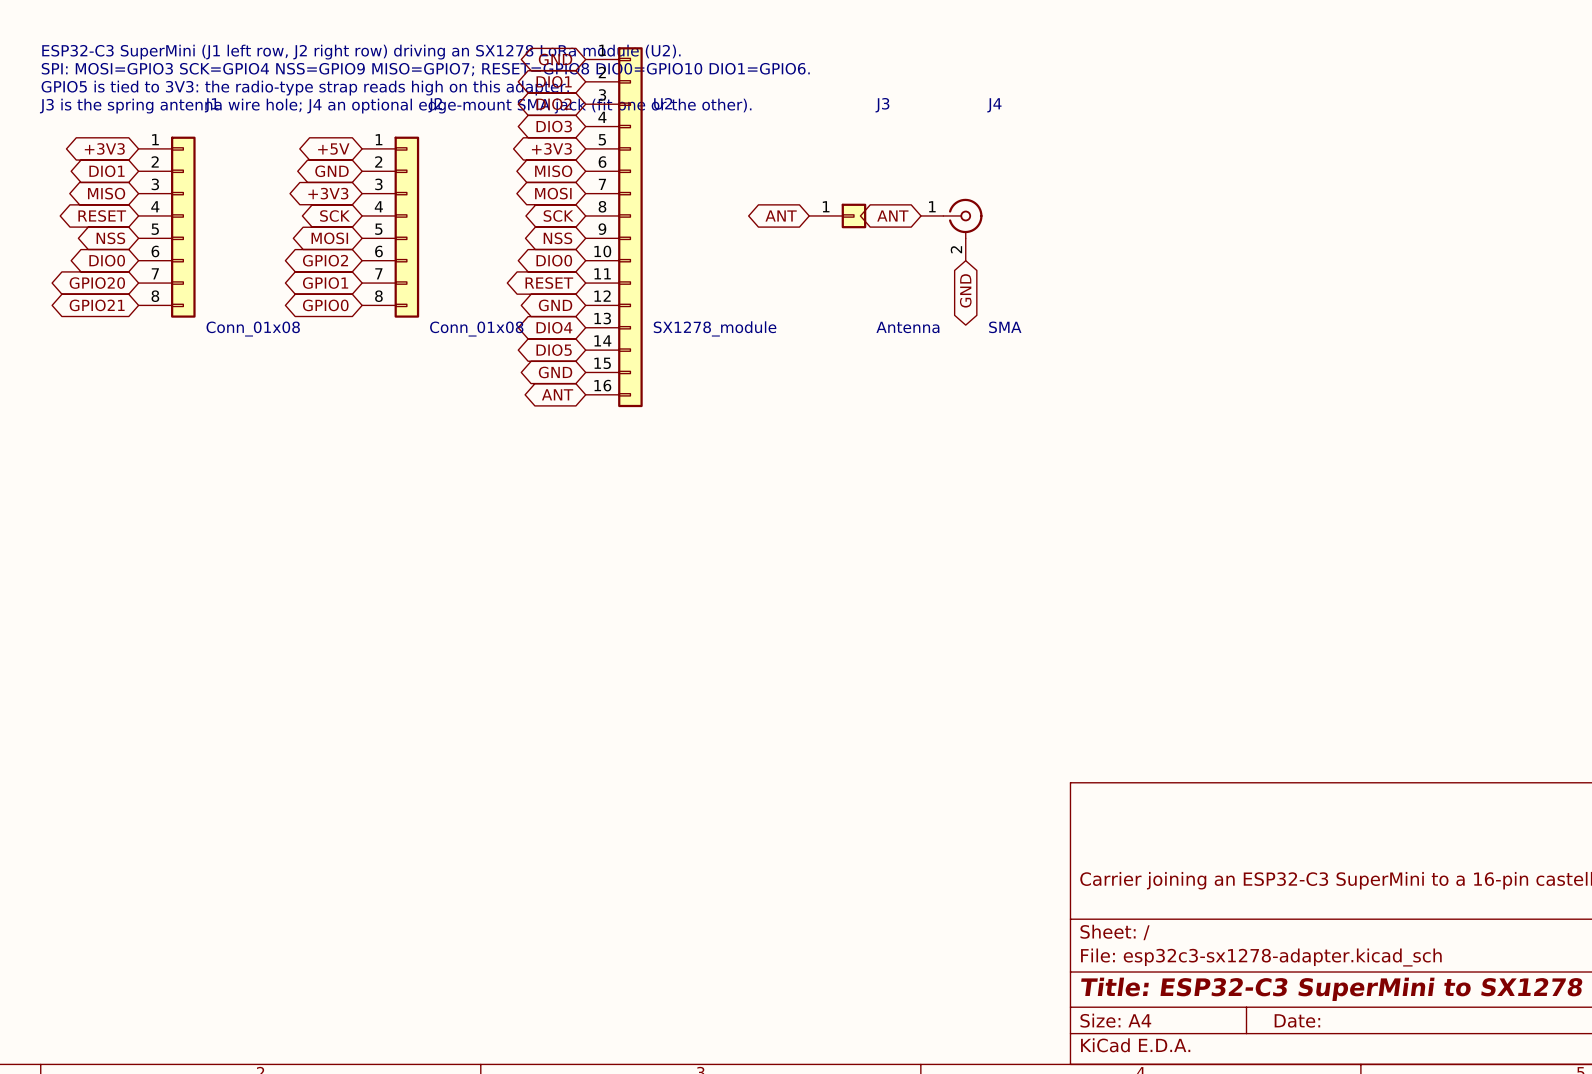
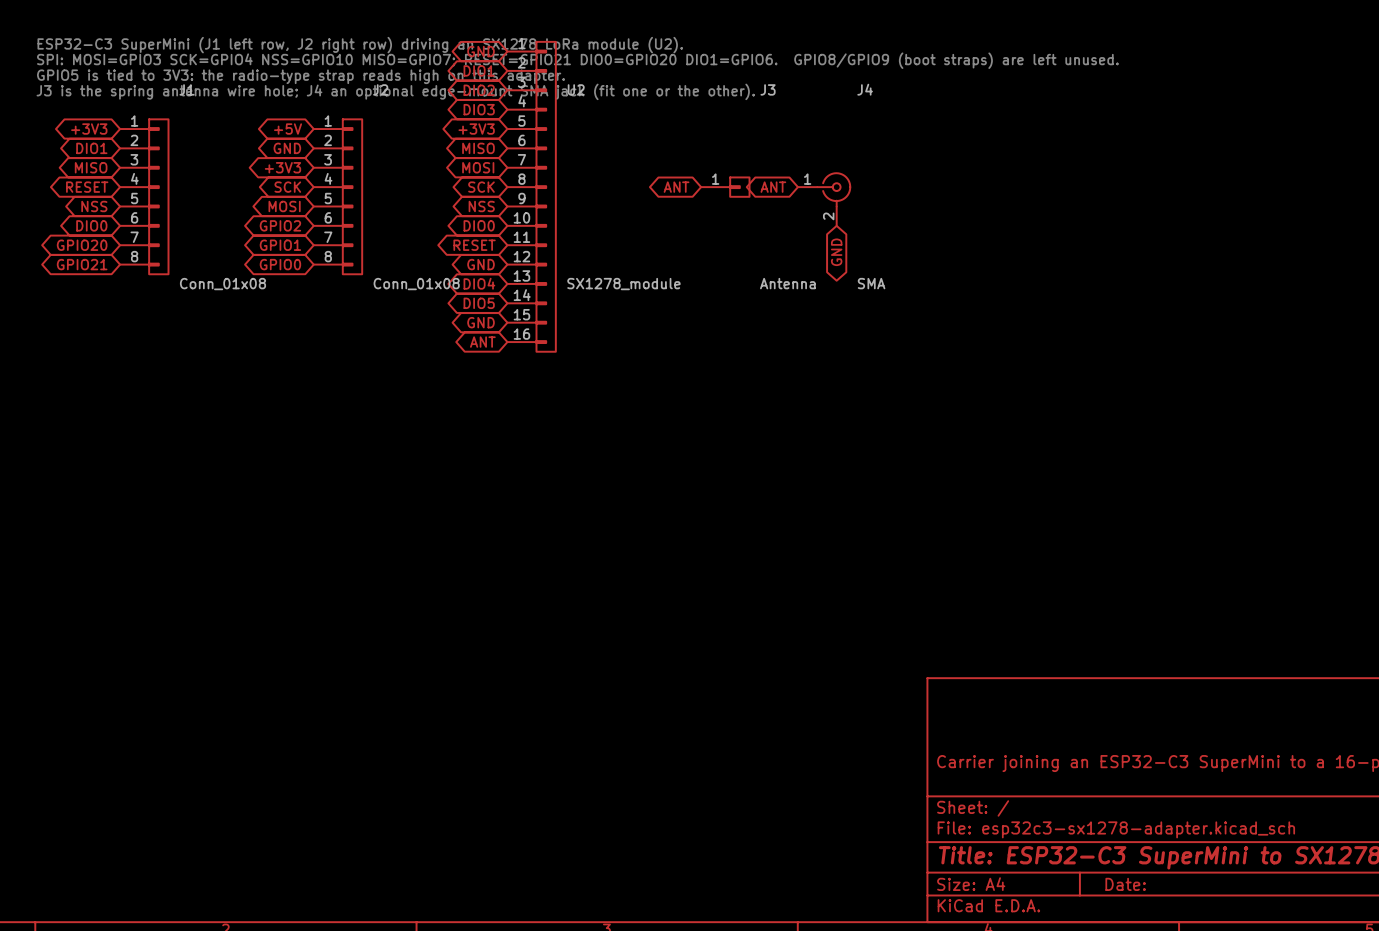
text: SPI: MOSI=GPIO3 SCK=GPIO4 NSS=GPIO9 MISO=GPIO7; RESET=GPIO8 DIO0=GPIO10 DIO1=GPIO6. (425, 69) -> SPI: MOSI=GPIO3 SCK=GPIO4 NSS=GPIO10 MISO=GPIO7; RESET=GPIO21 DIO0=GPIO20 DIO1=GPIO6. GPIO8/GPIO9 (boot straps) are left unused. (577, 60)

